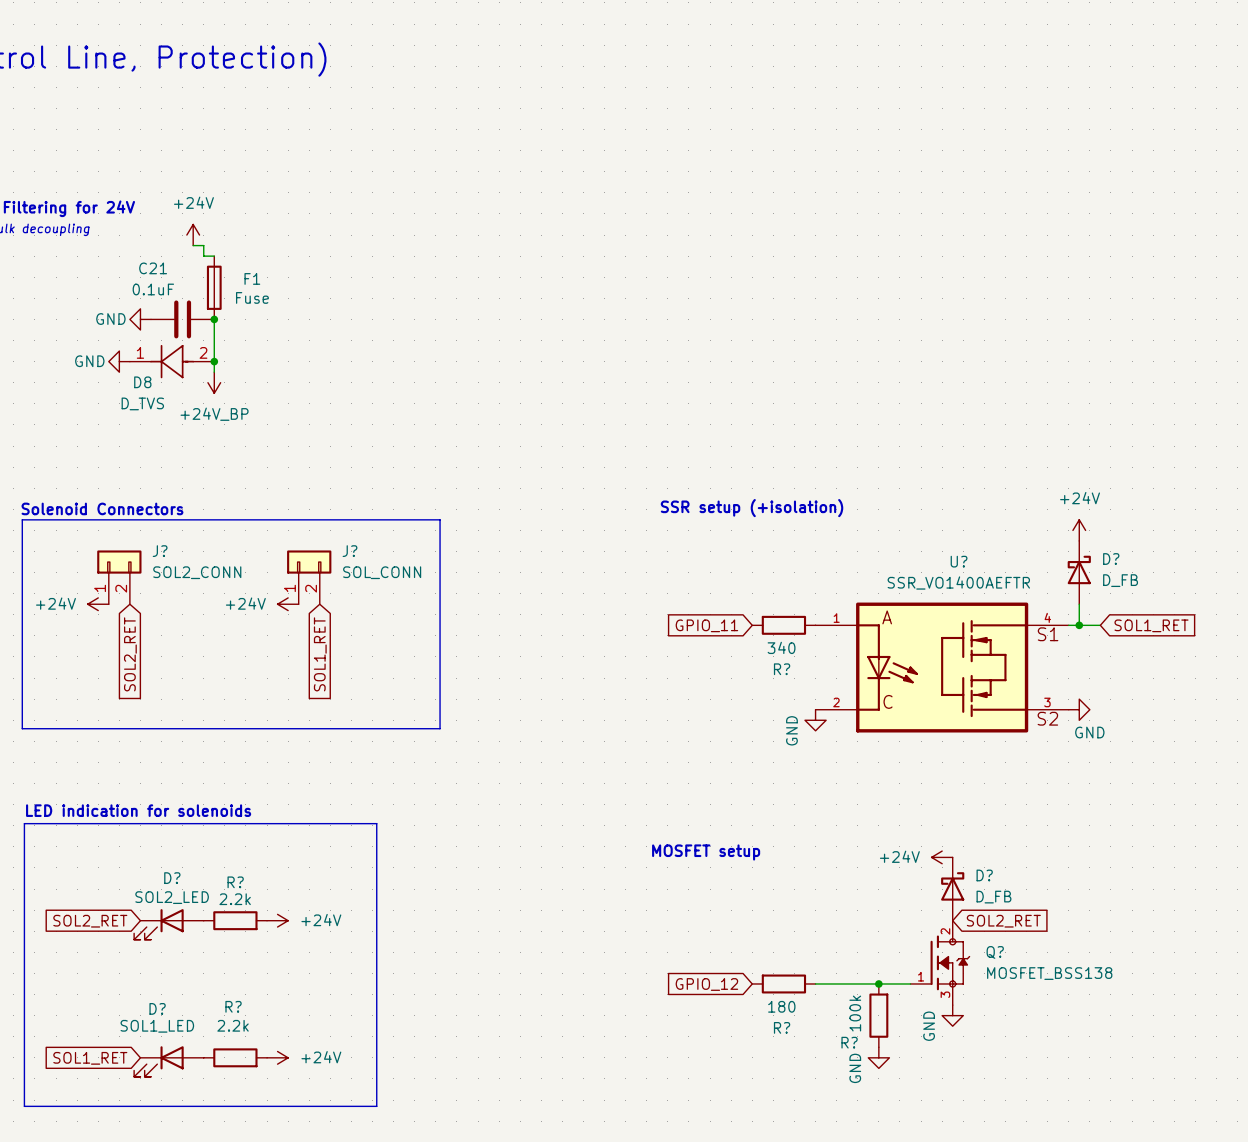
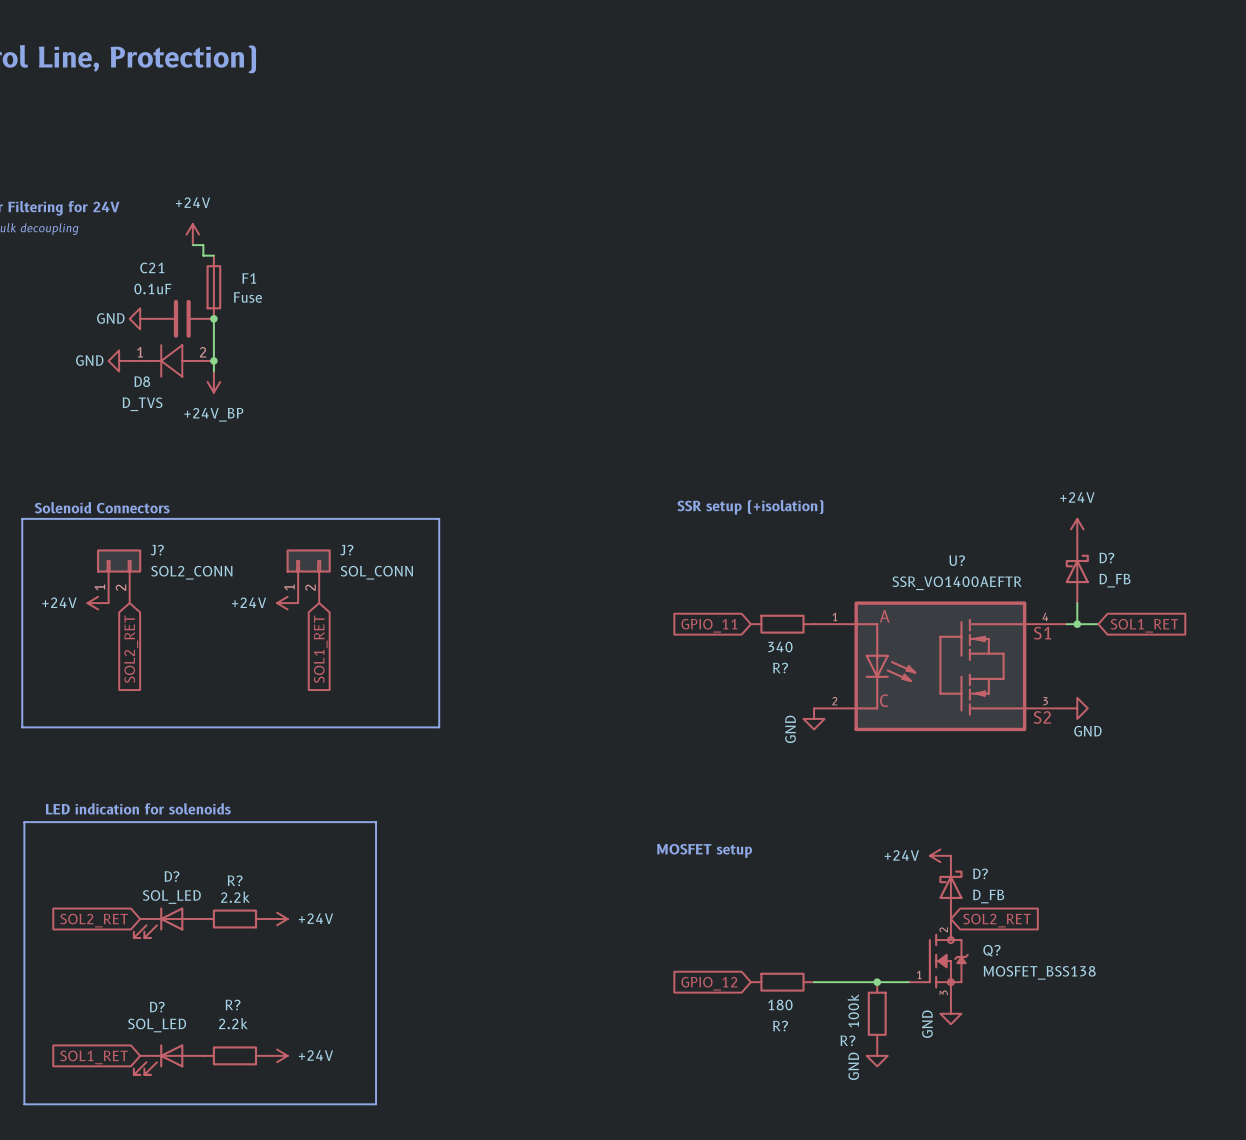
D? value: SOL2_LED (172, 897) -> SOL_LED (171, 897)
D? value: SOL1_LED (157, 1026) -> SOL_LED (157, 1025)

